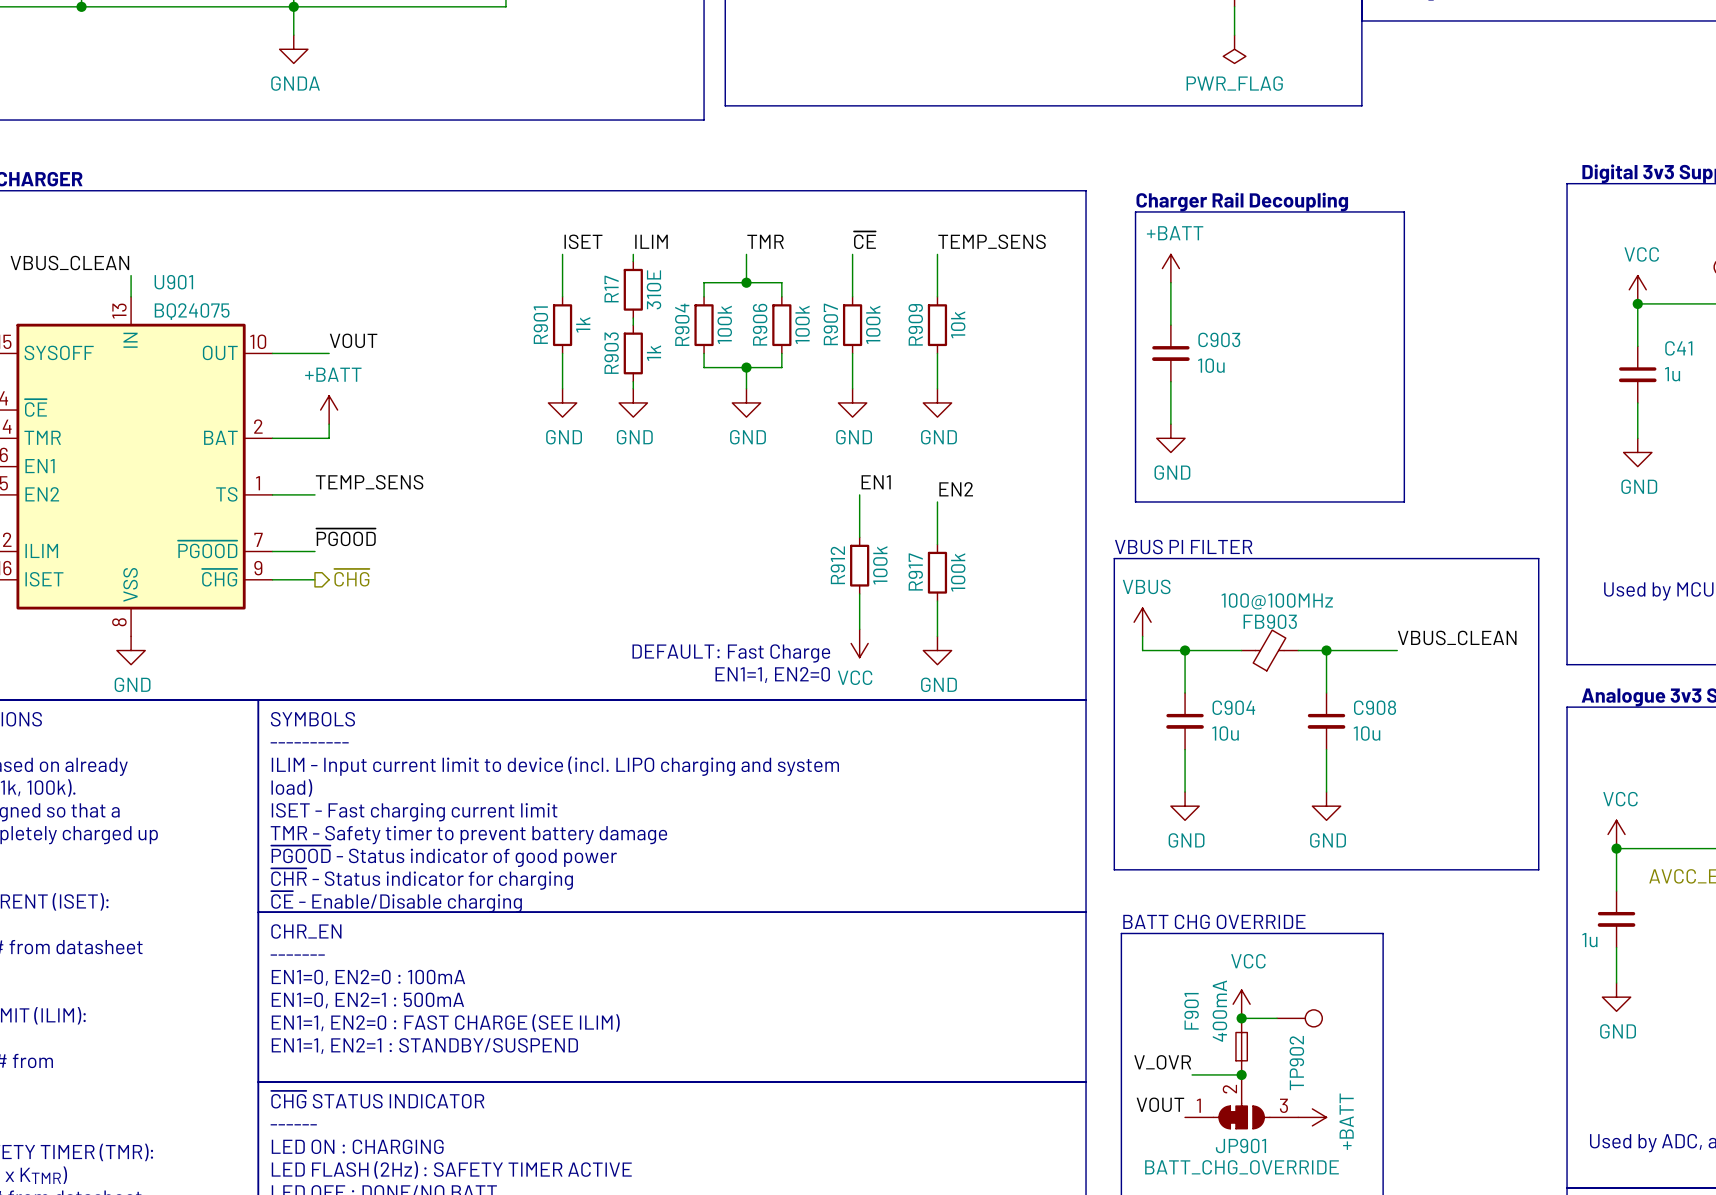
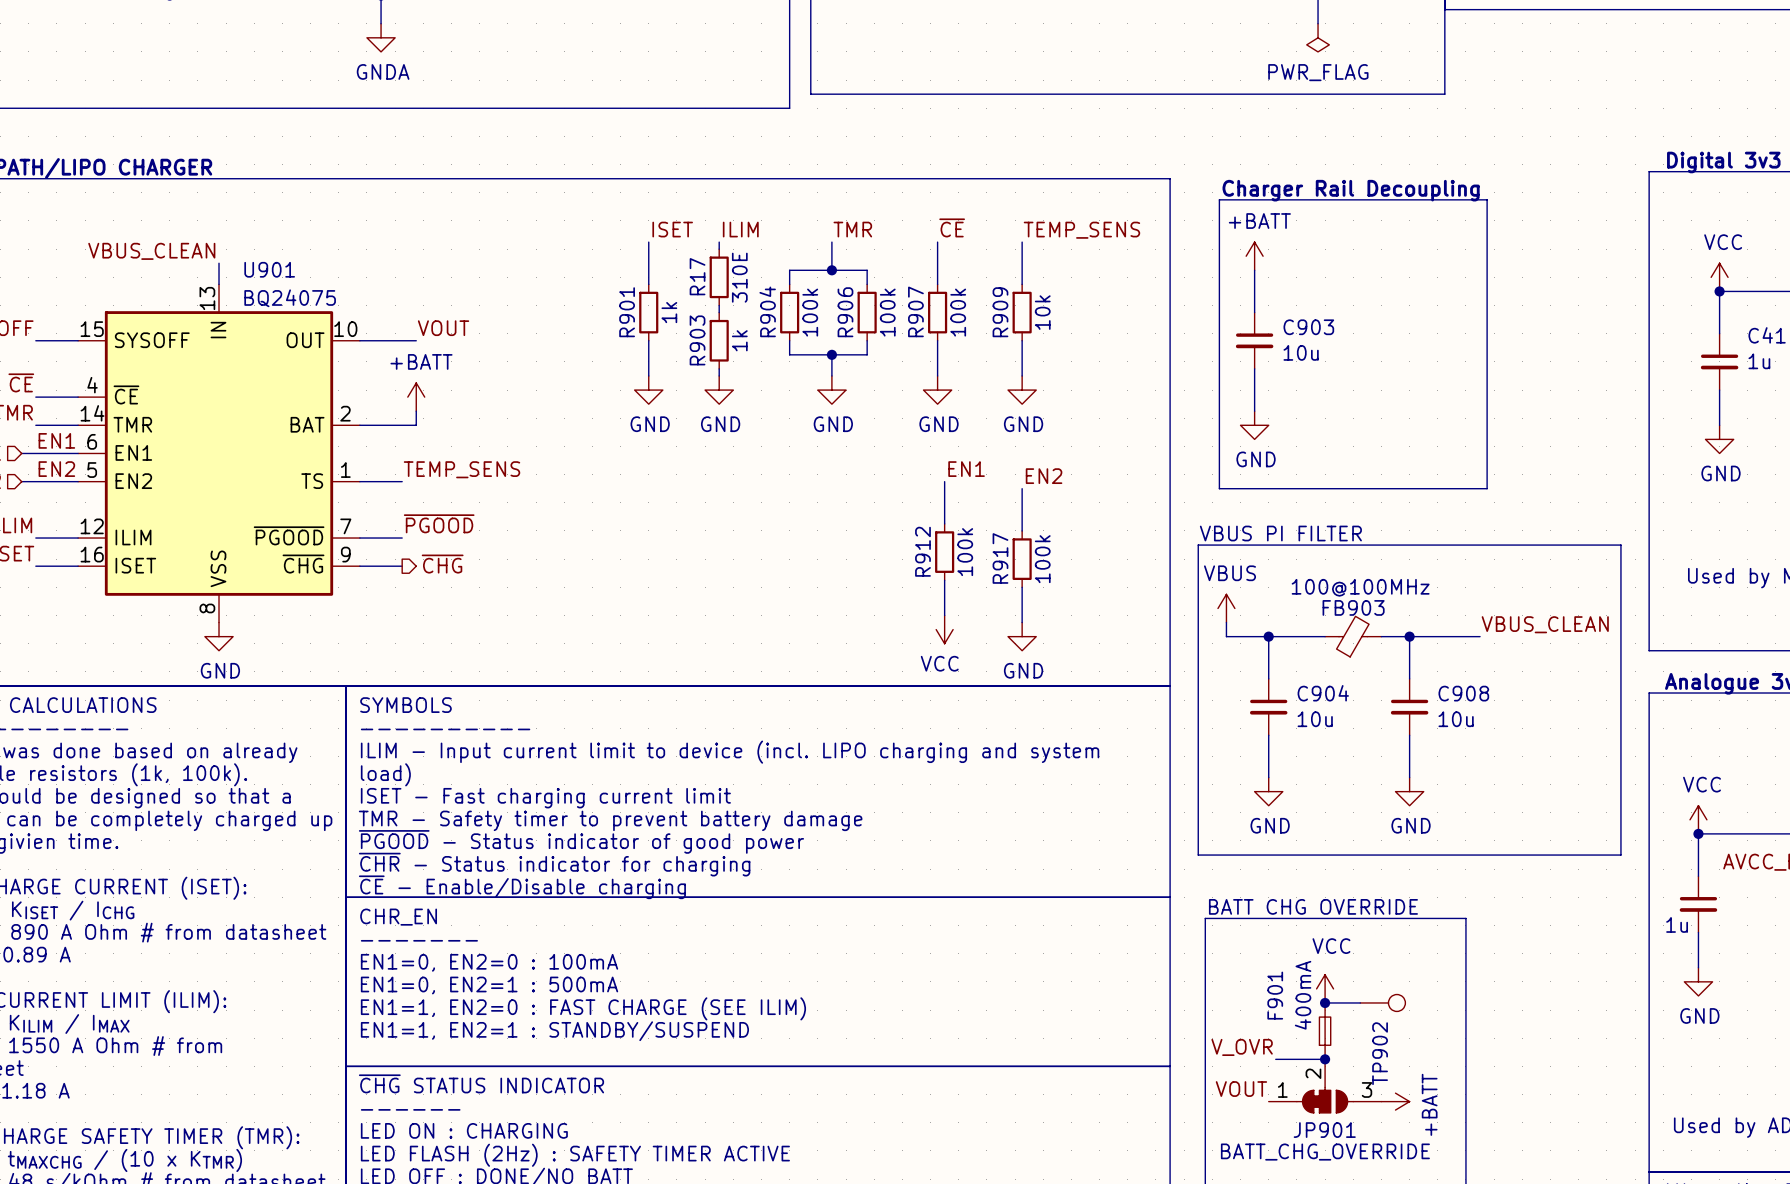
text: DEFAULT: Fast Charge (731, 653) -> none
text: EN1=1, EN2=0 (772, 675) -> none

